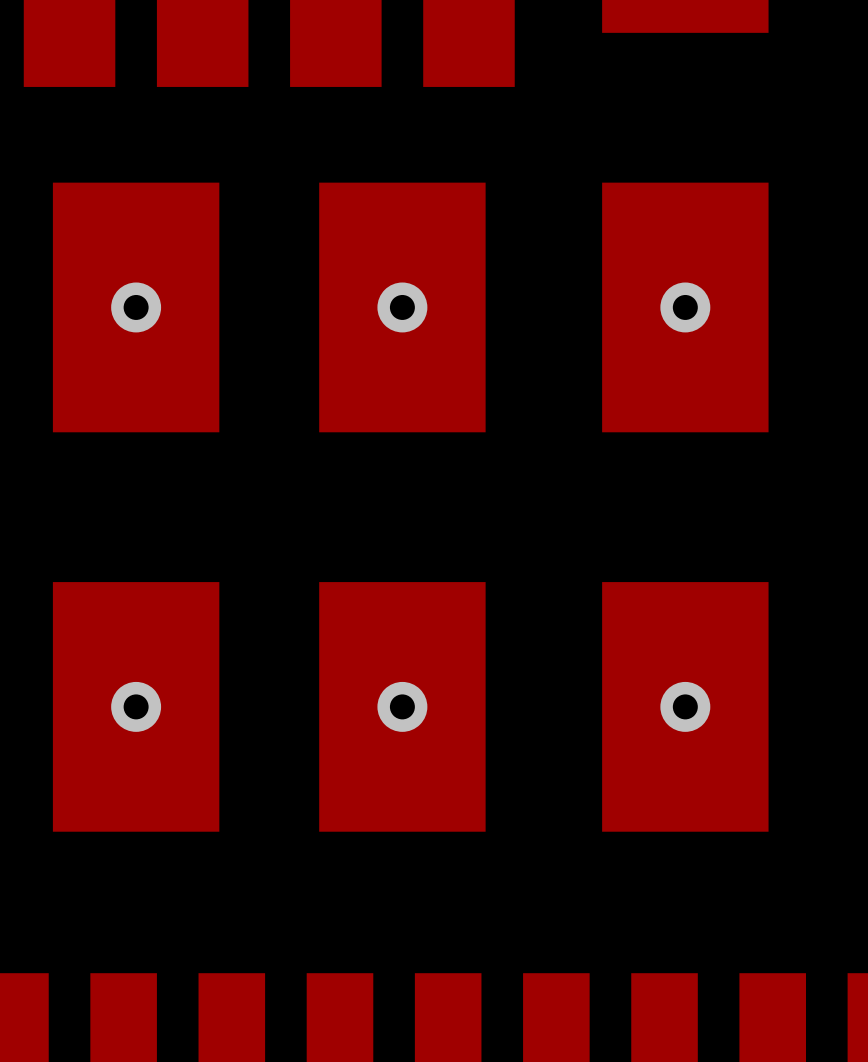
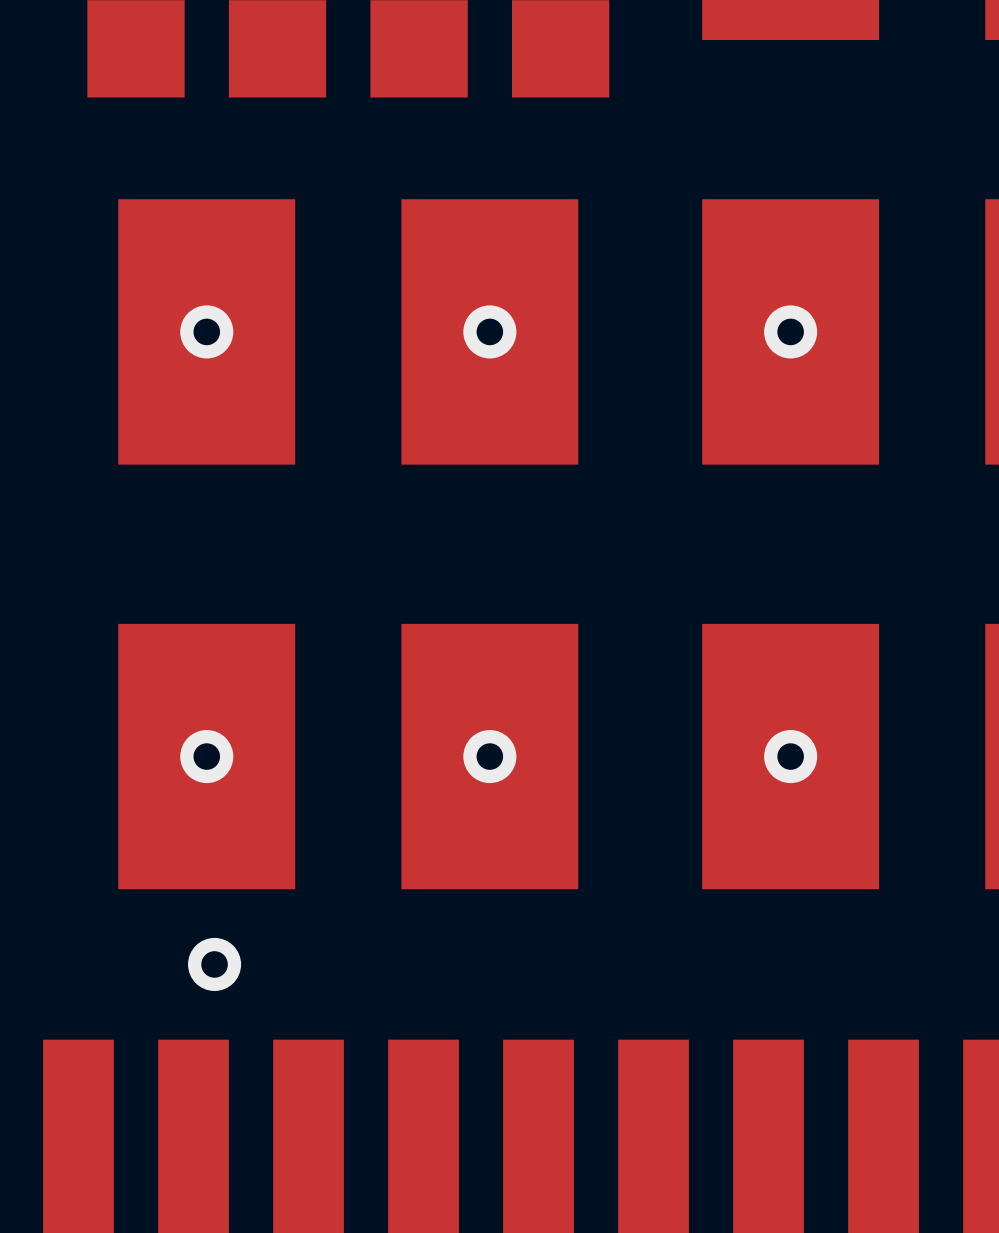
via: none -> (214, 964)

